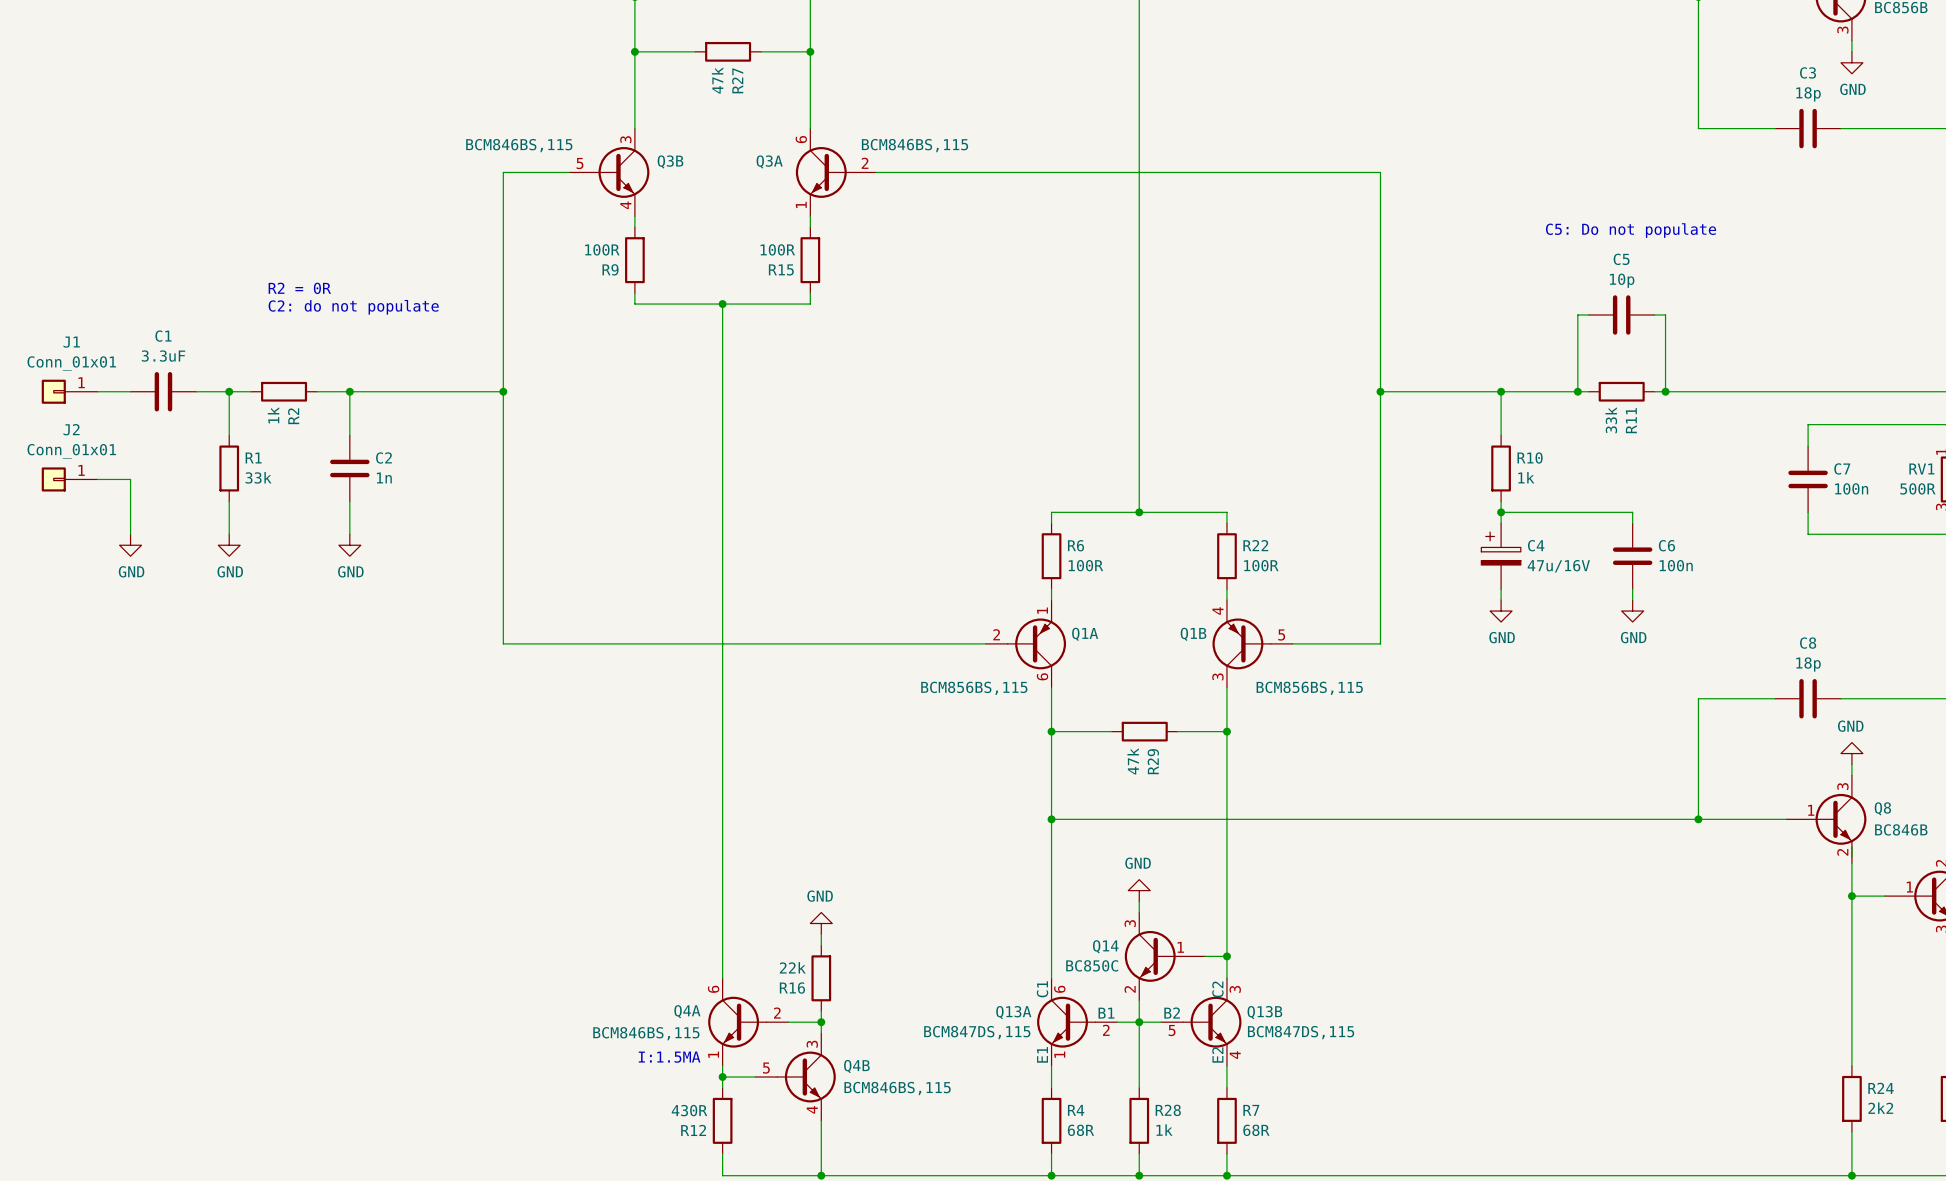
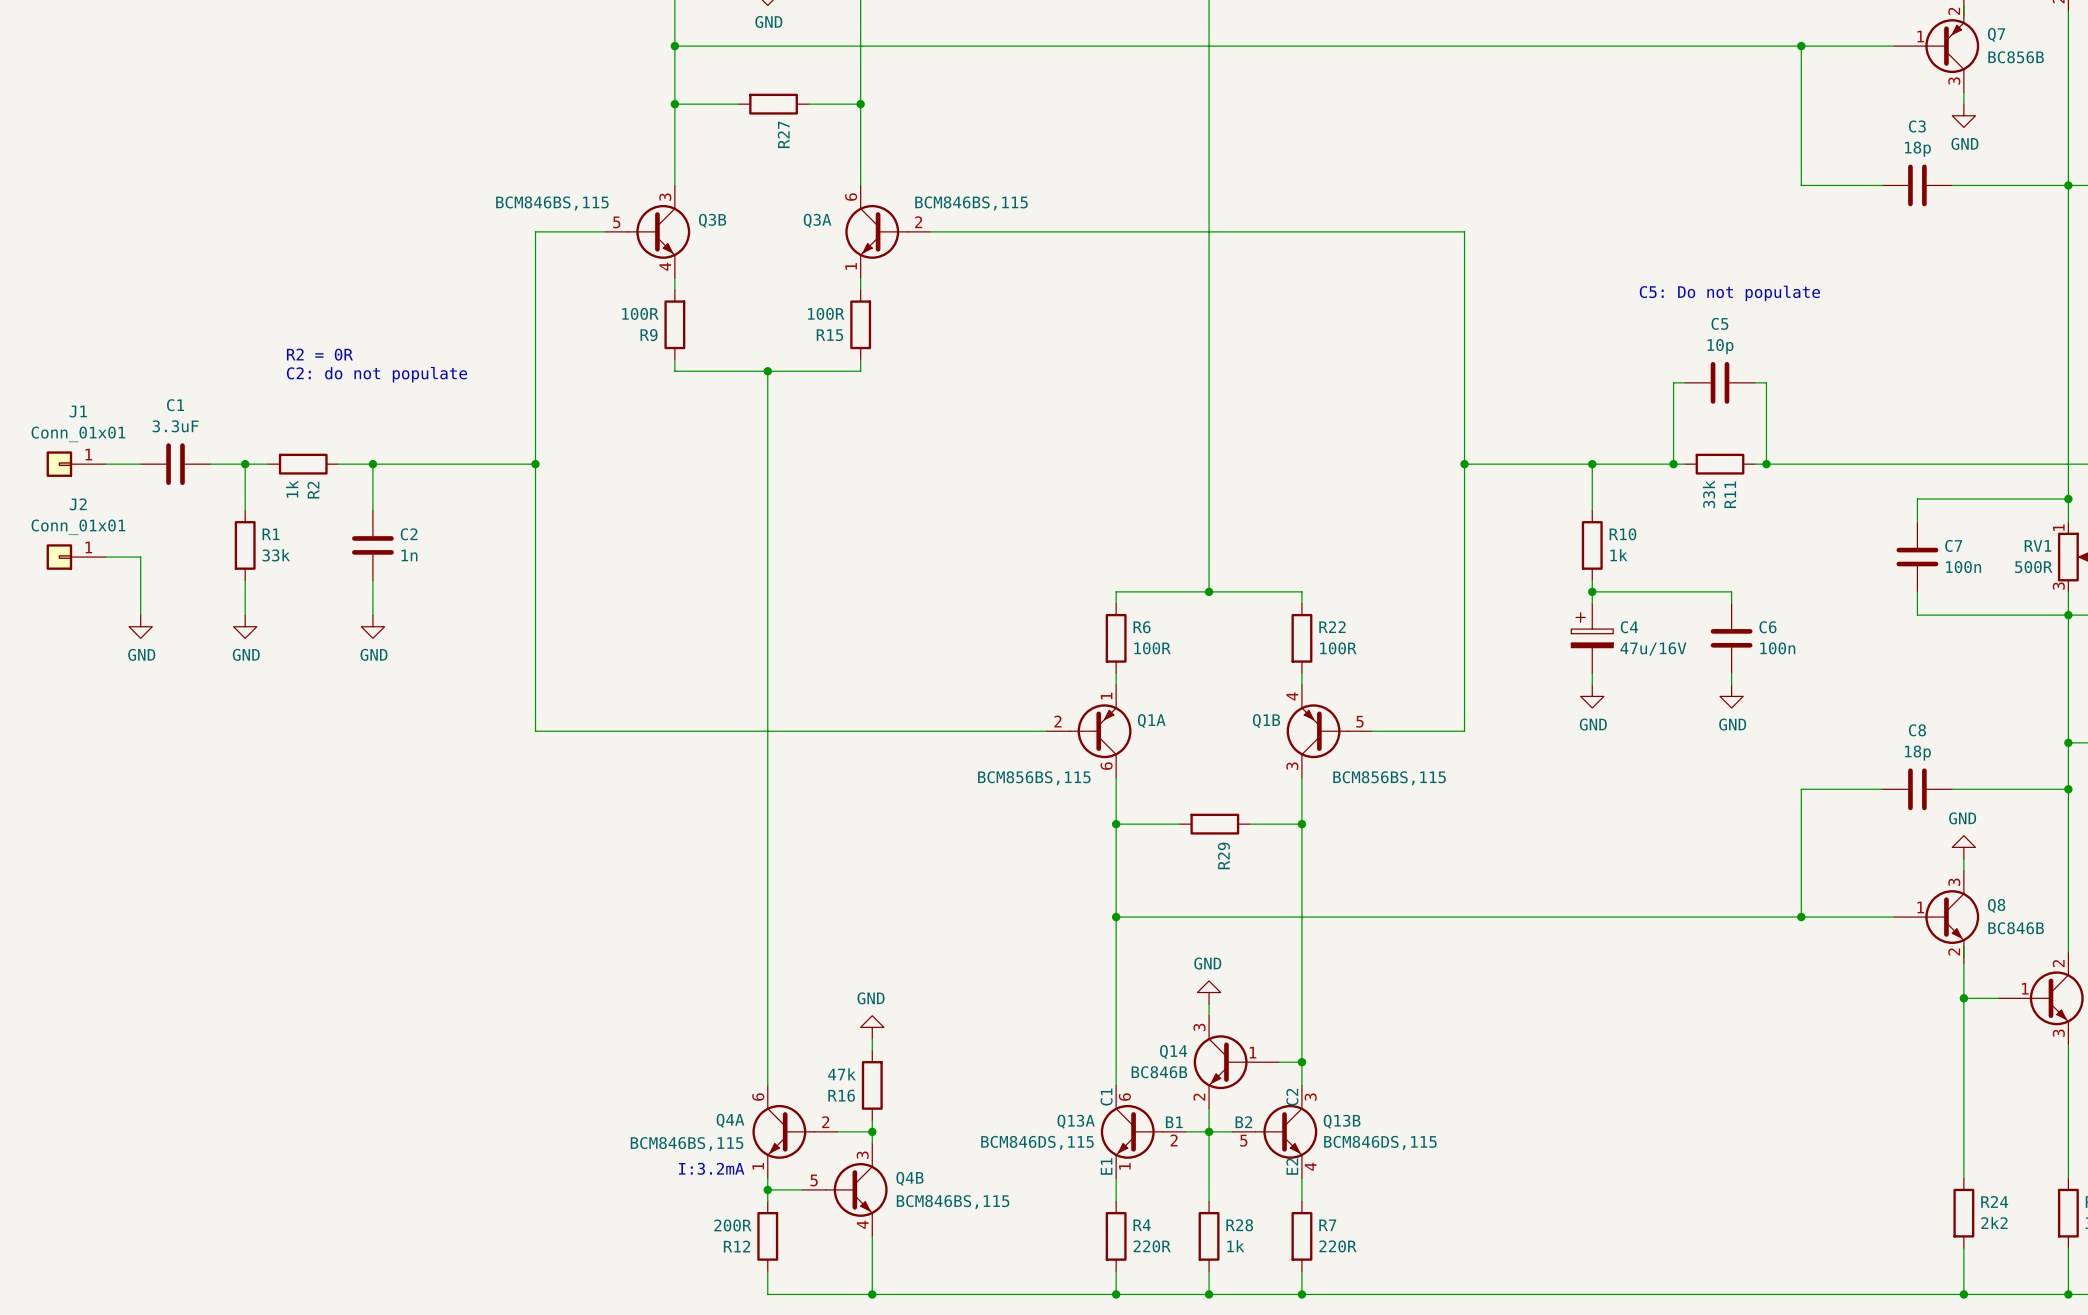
R27 value: 47k (717, 80) -> none
R29 value: 47k (1133, 761) -> none
Q14 value: BC850C (1092, 965) -> BC846B (1159, 1072)
R16 value: 22k (792, 967) -> 47k (841, 1074)
Q13A value: BCM847DS,115 (977, 1032) -> BCM846DS,115 (1037, 1142)
Q13B value: BCM847DS,115 (1301, 1032) -> BCM846DS,115 (1380, 1142)
text: I:1.5MA (669, 1057) -> I:3.2mA (711, 1168)
R12 value: 430R (689, 1110) -> 200R (732, 1225)
R4 value: 68R (1080, 1130) -> 220R (1152, 1246)
R7 value: 68R (1256, 1130) -> 220R (1337, 1246)

